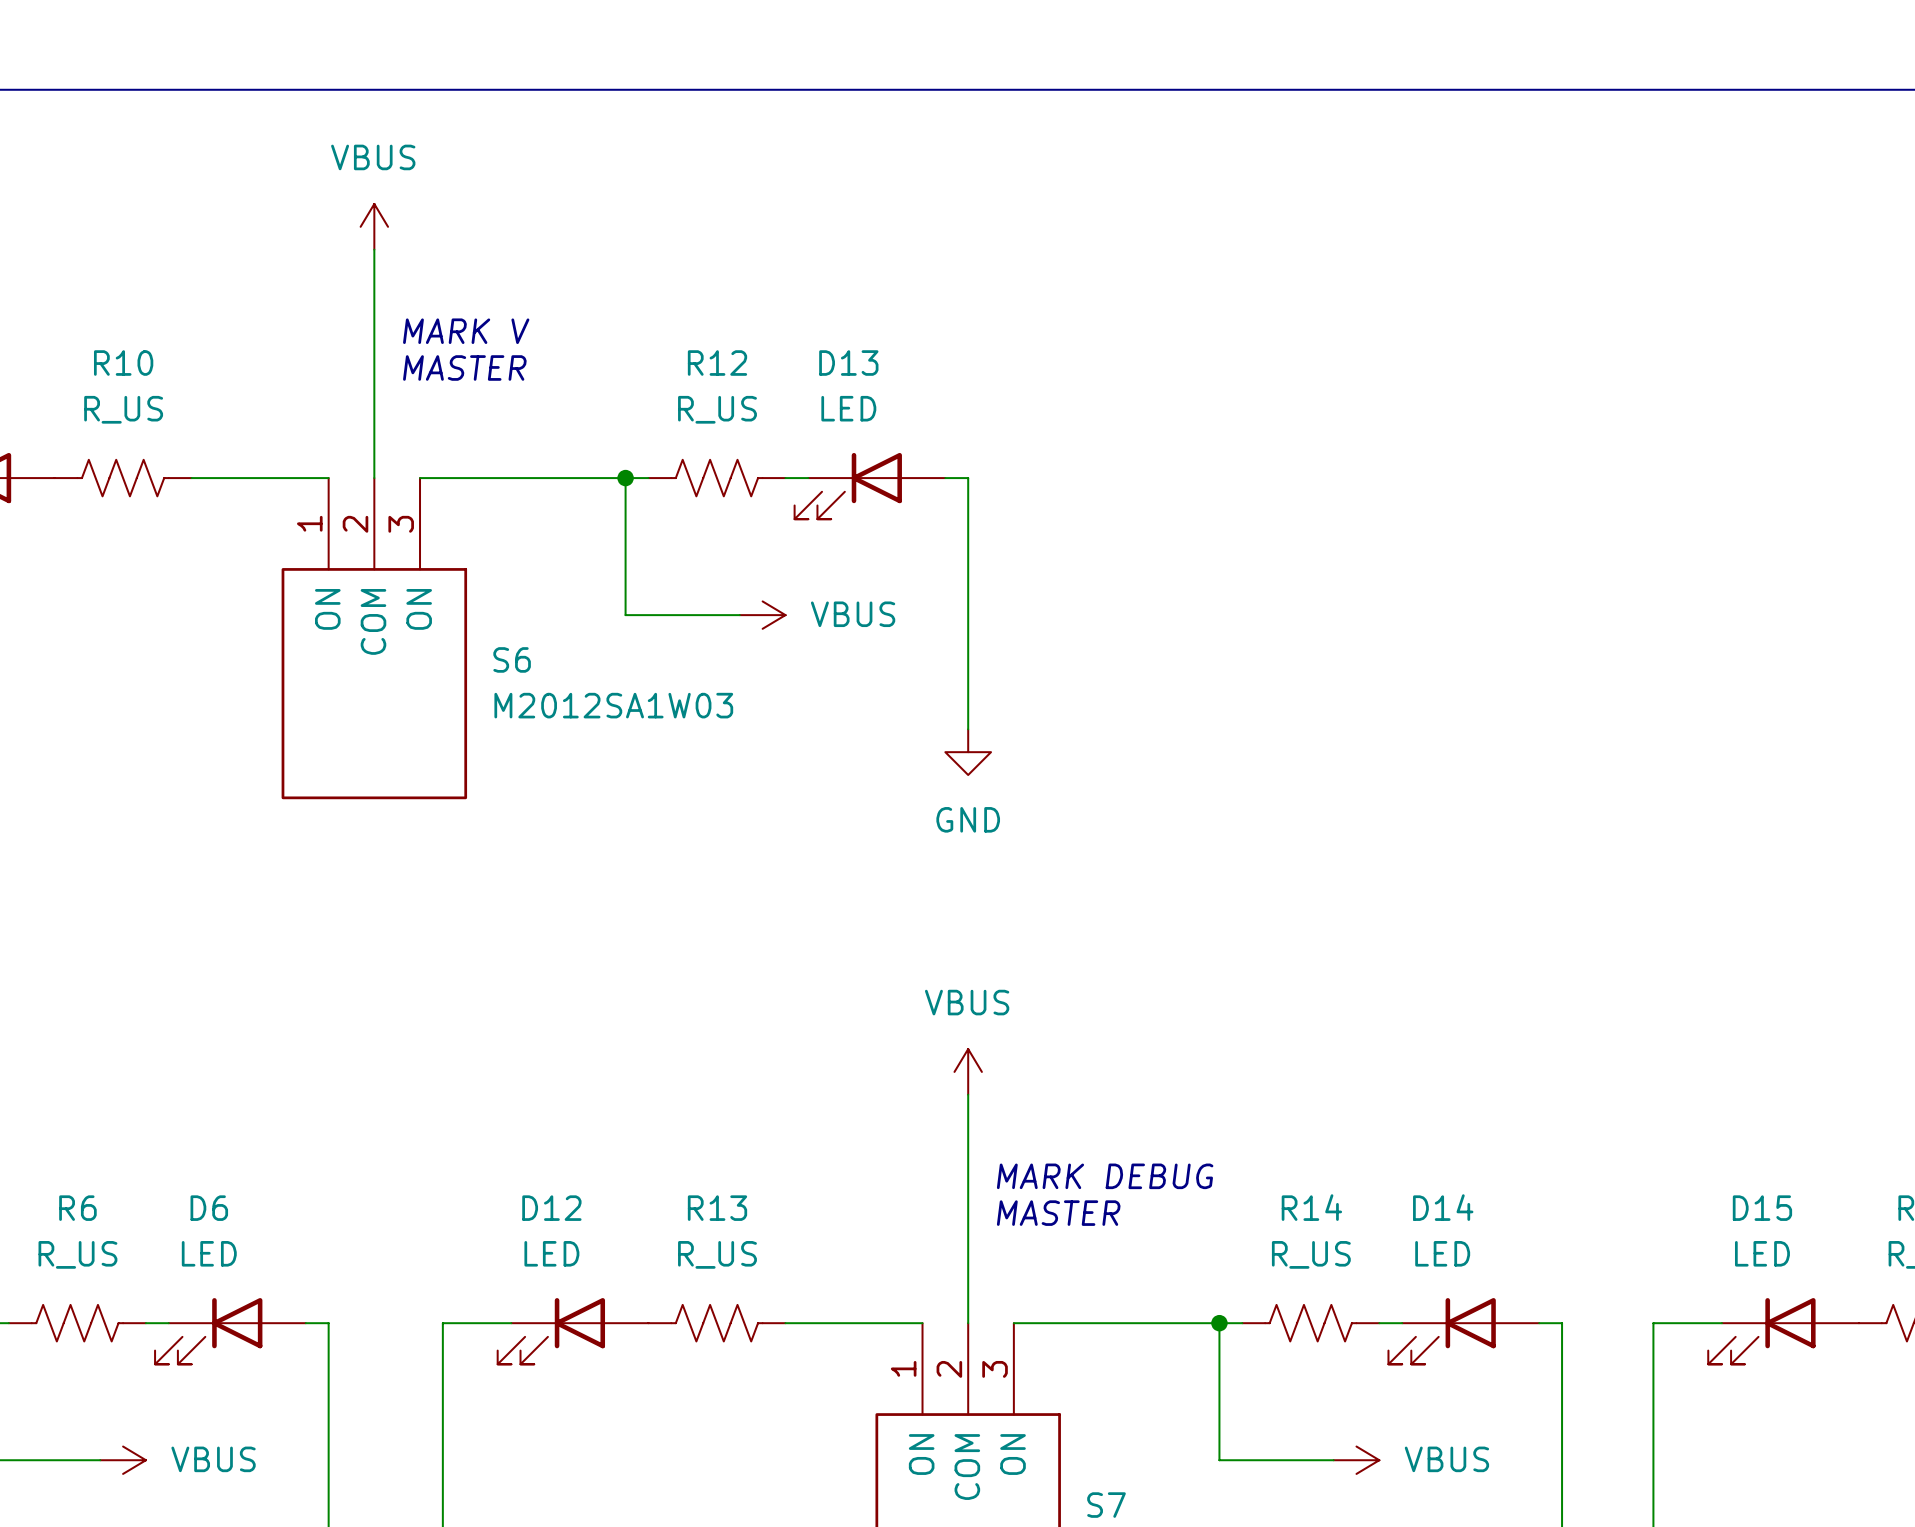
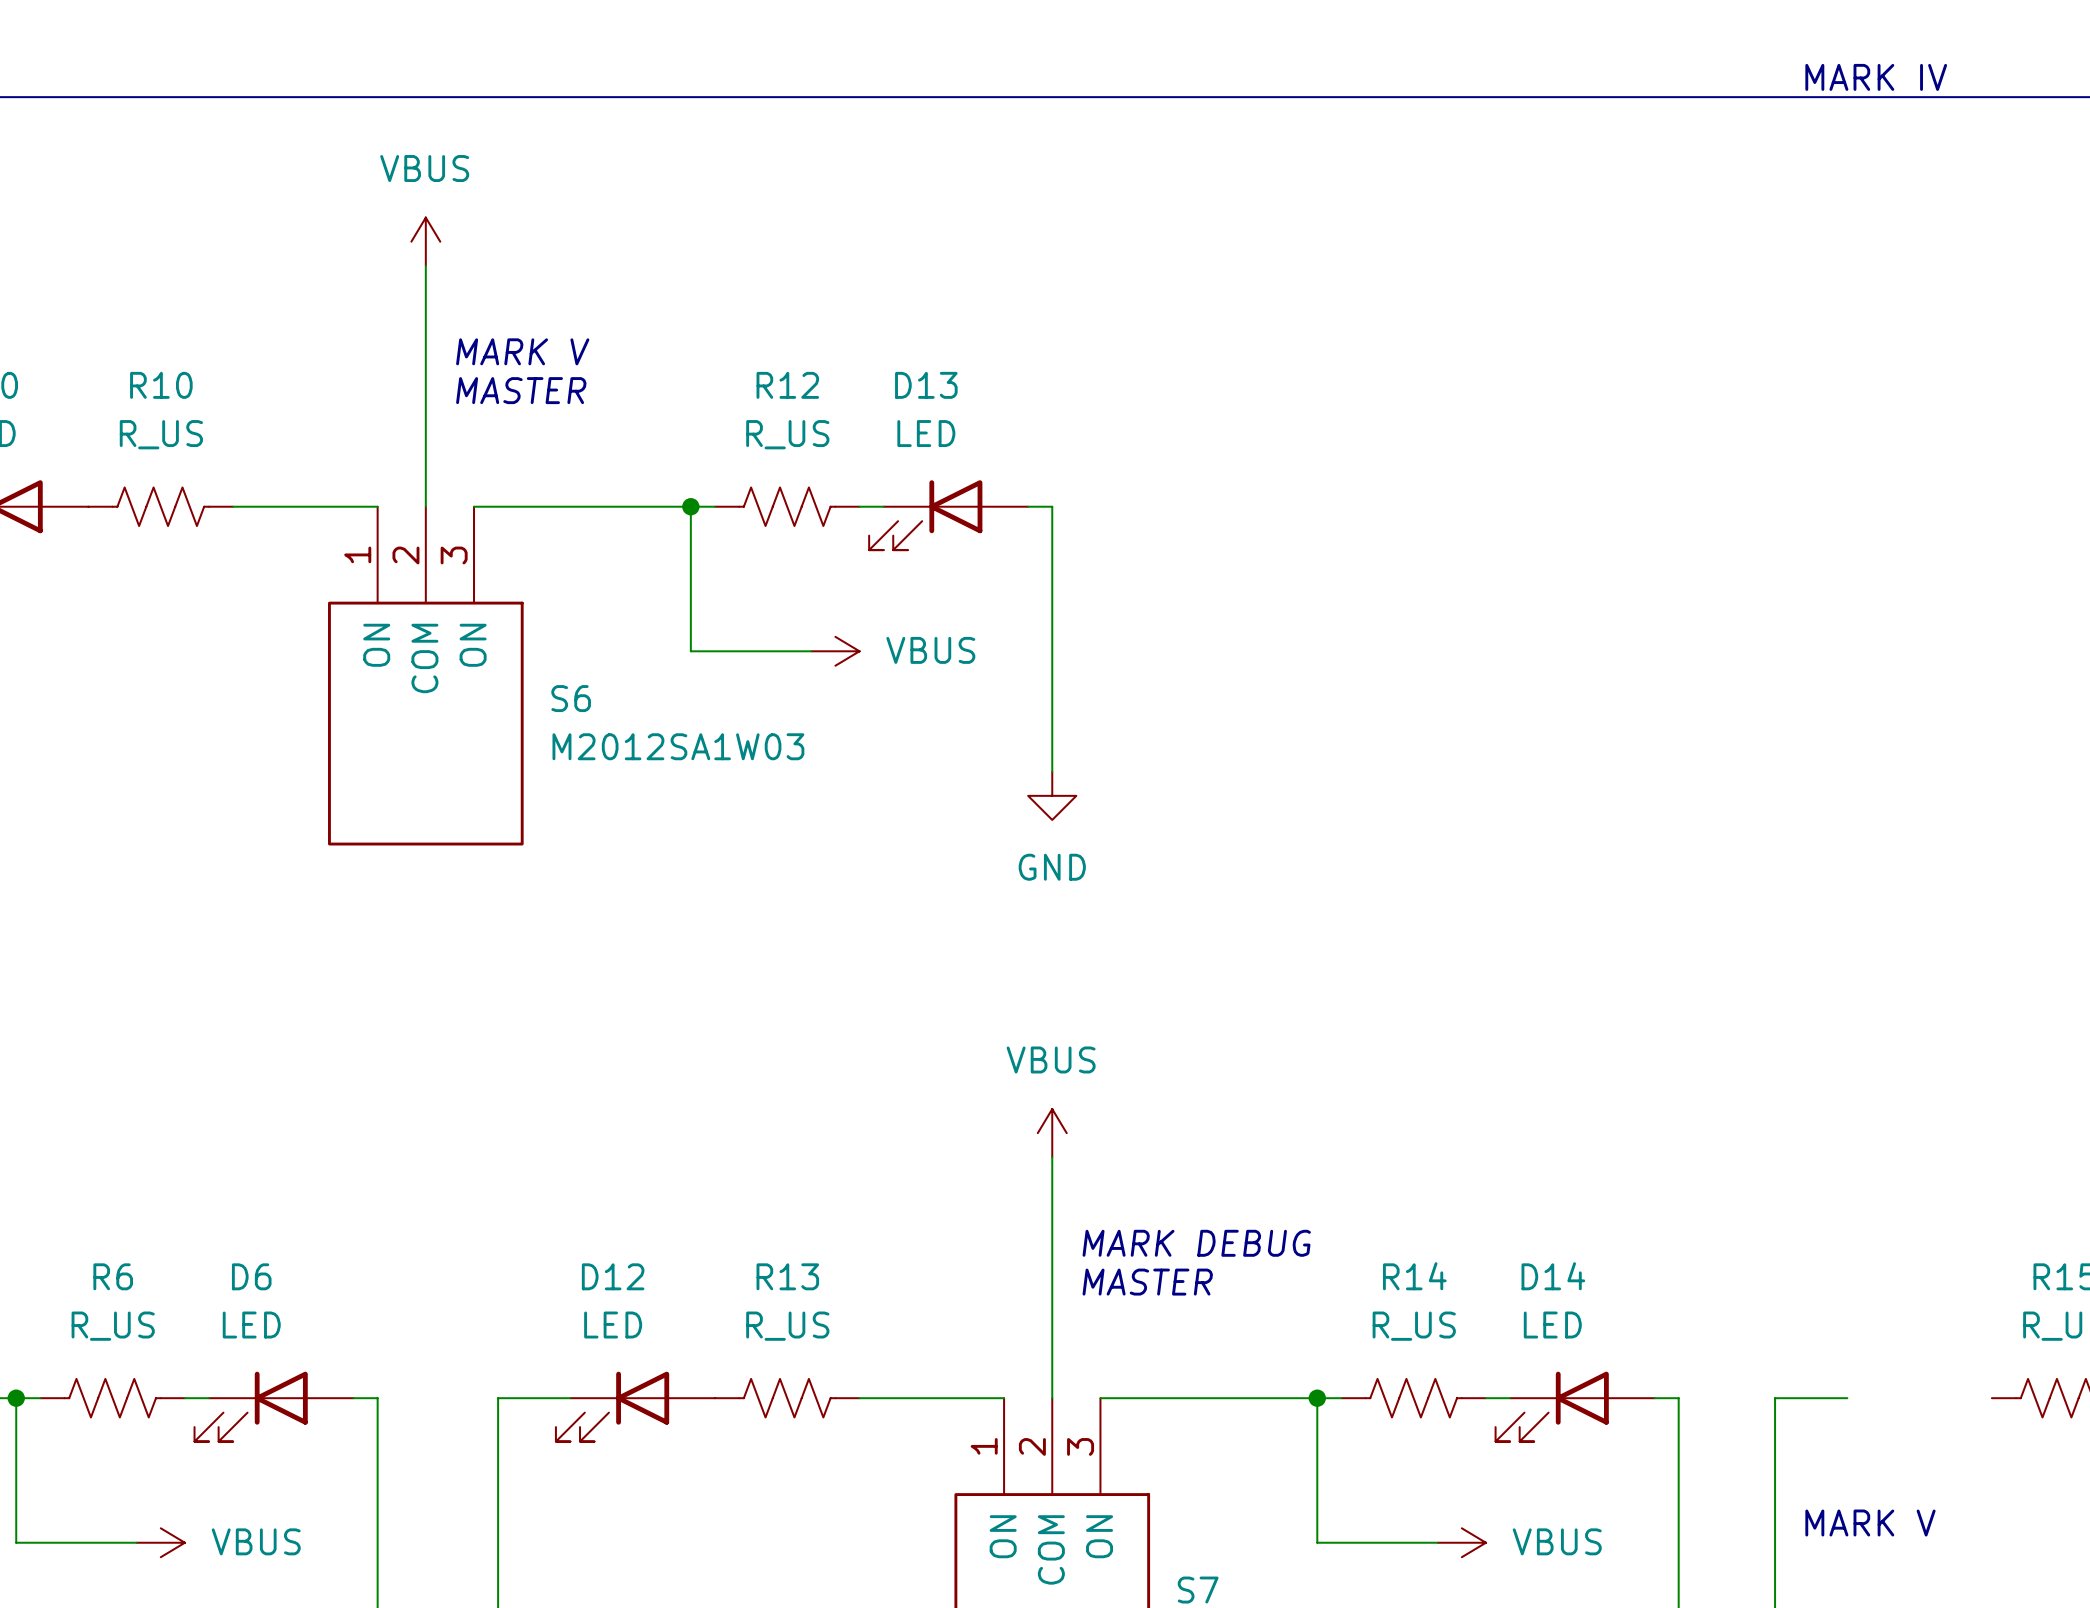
text: none -> MARK IV (1876, 77)
D15: LED (1783, 1331) -> none
text: none -> MARK V (1870, 1523)

